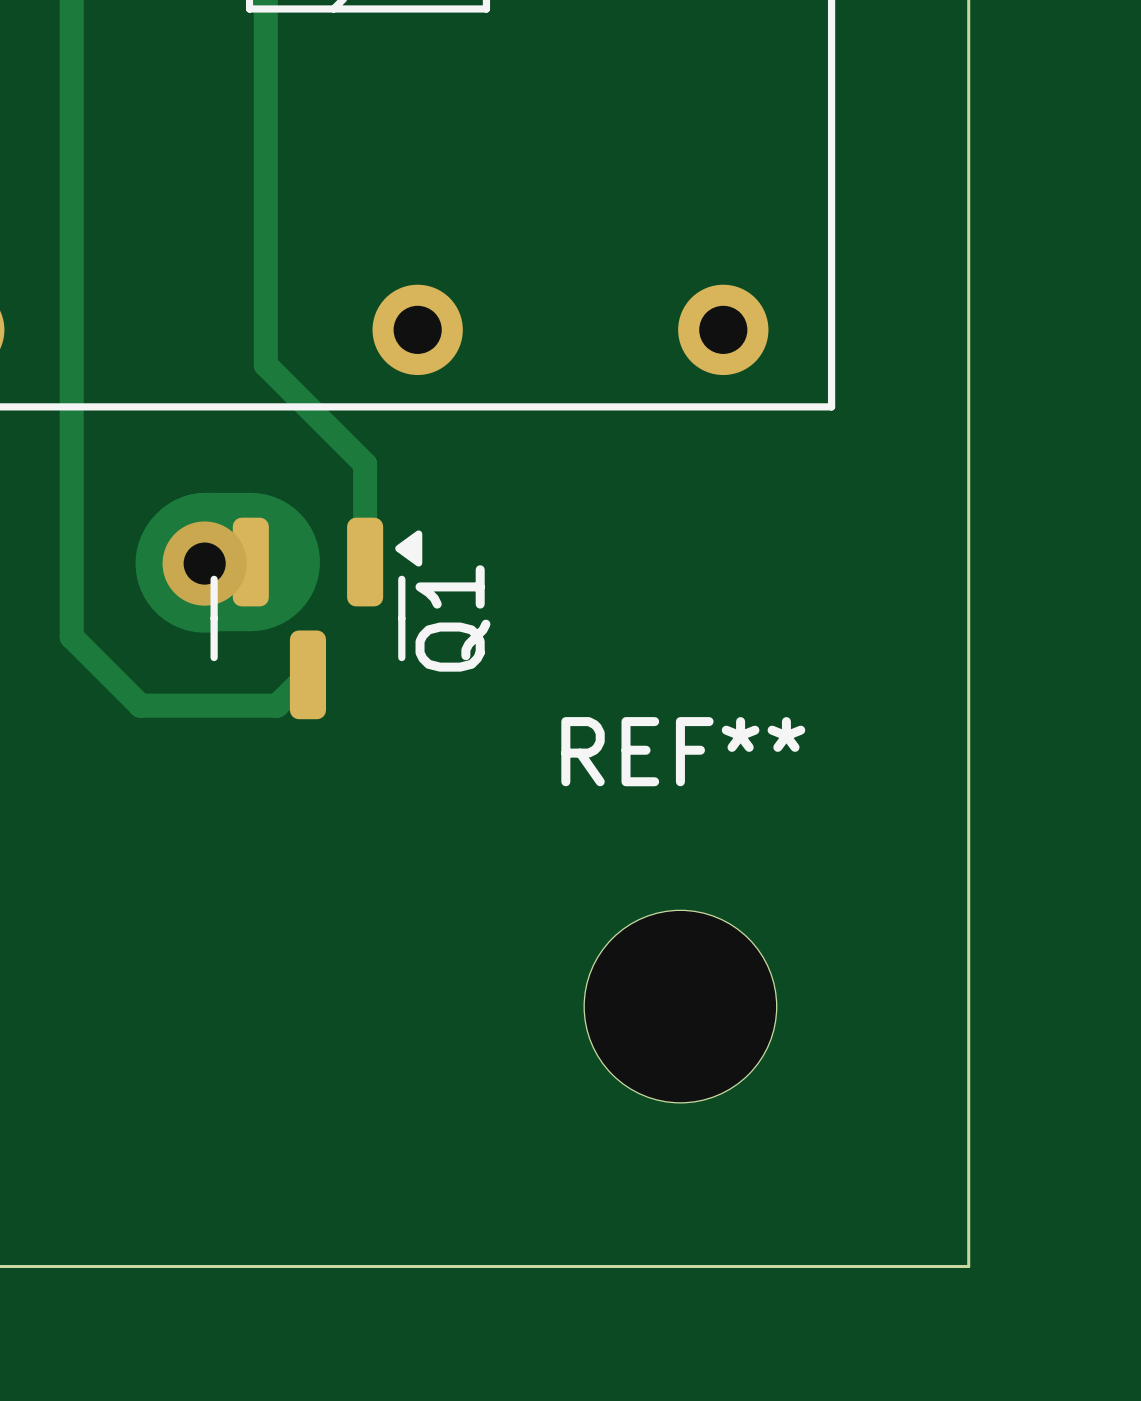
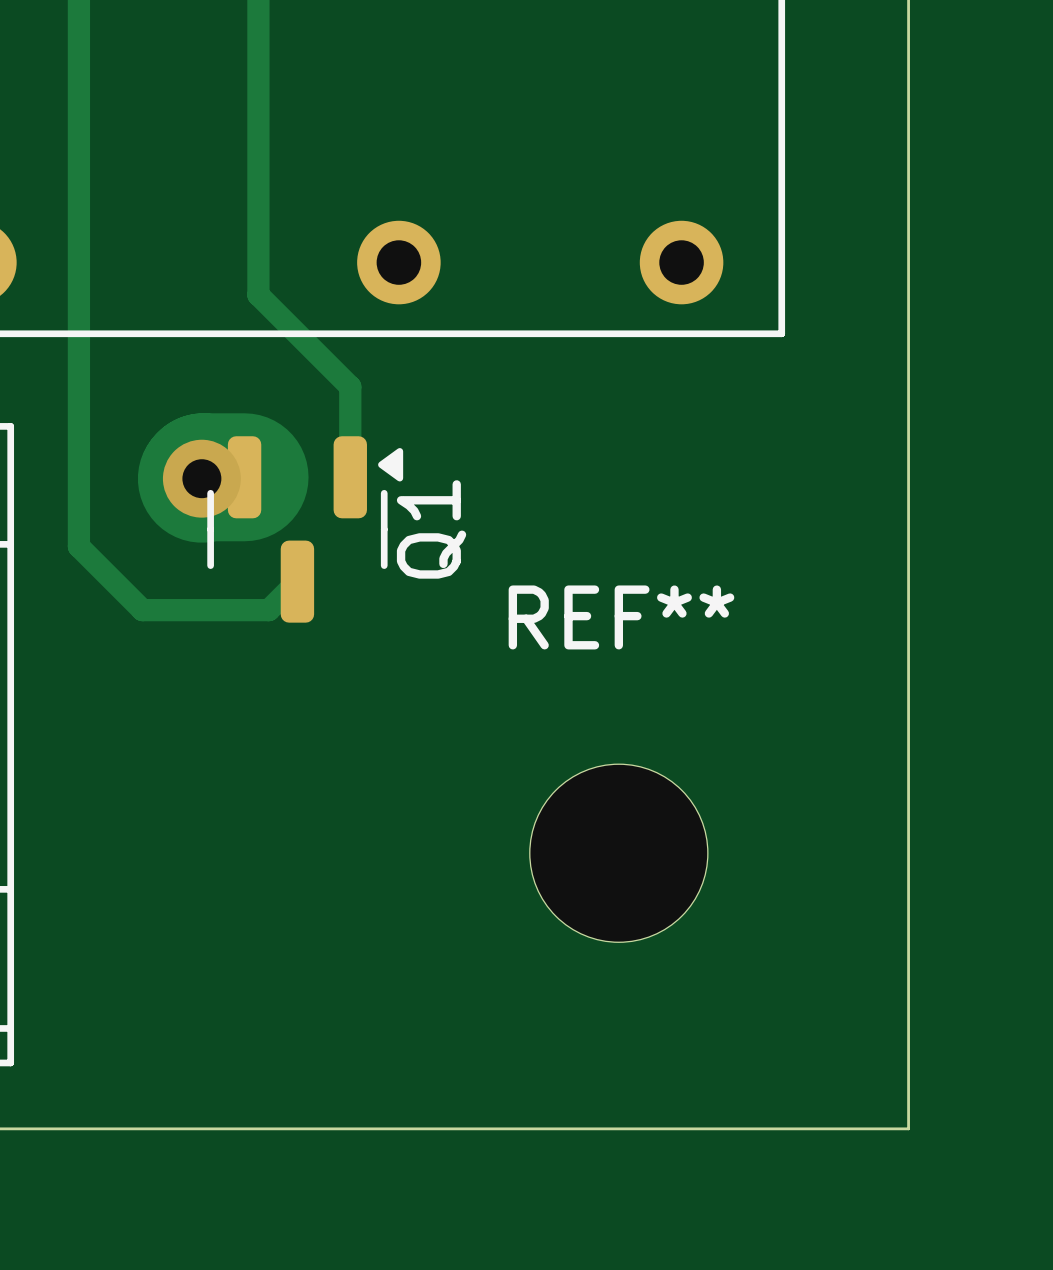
REF** position: (680, 1006) -> (618, 853)

